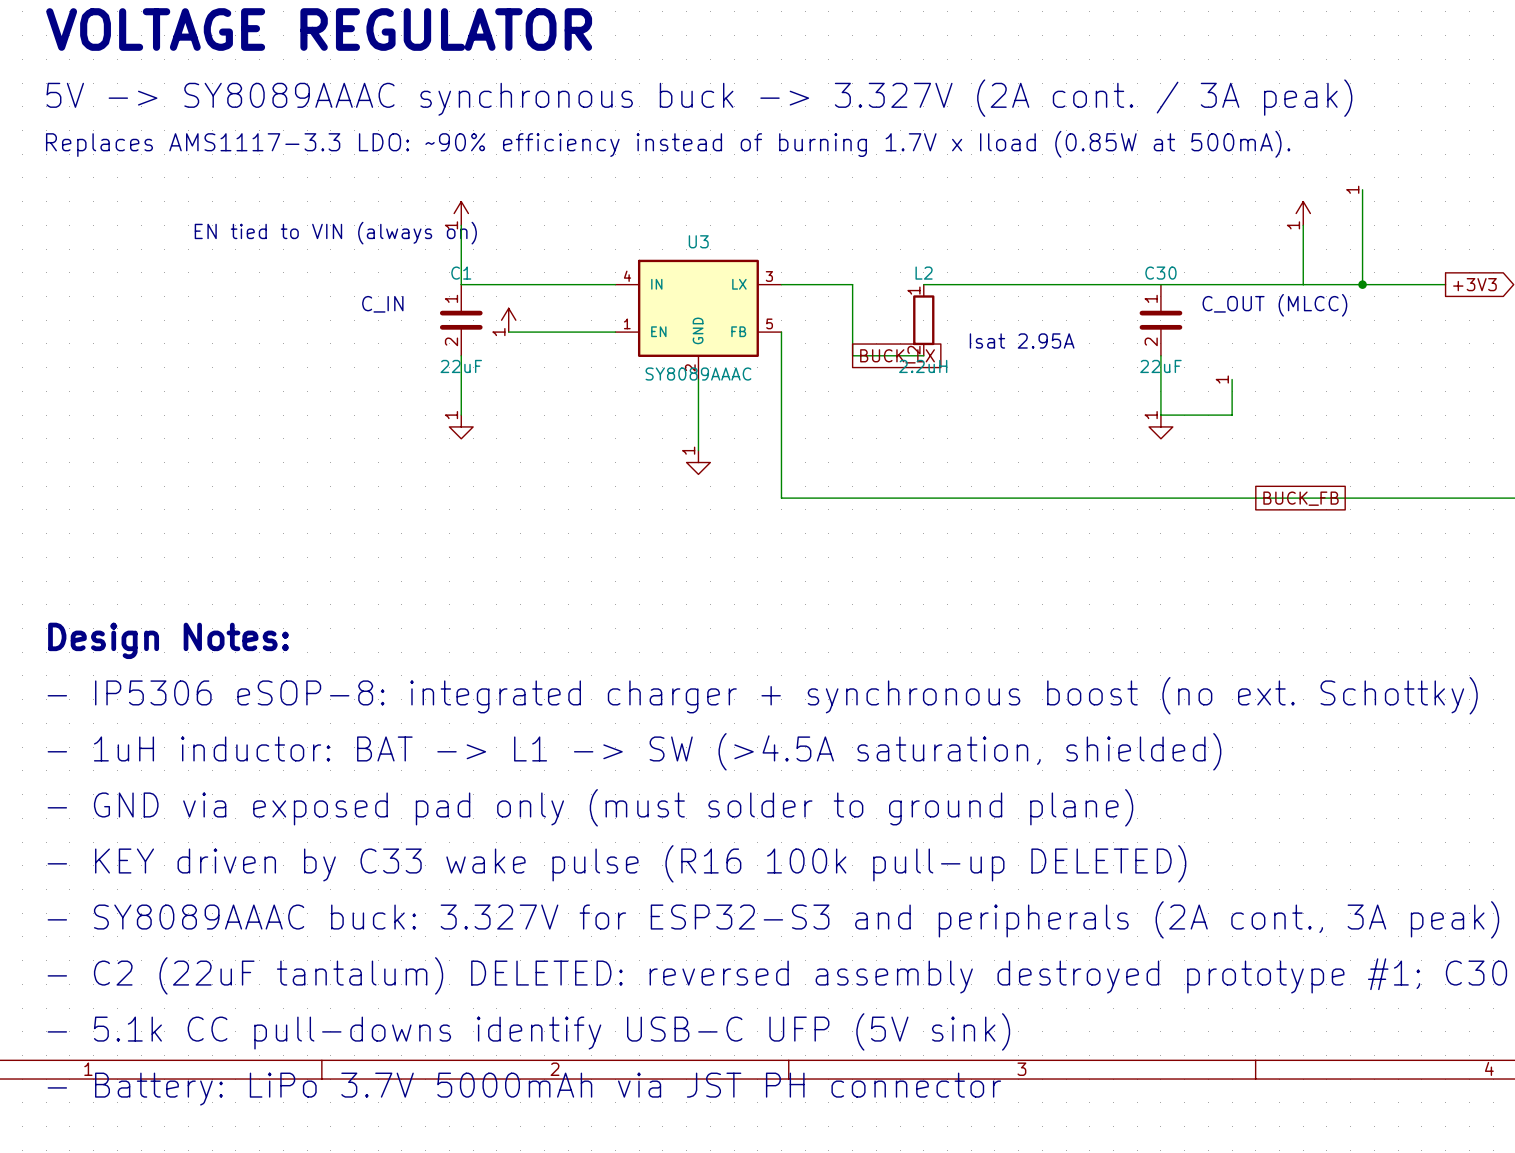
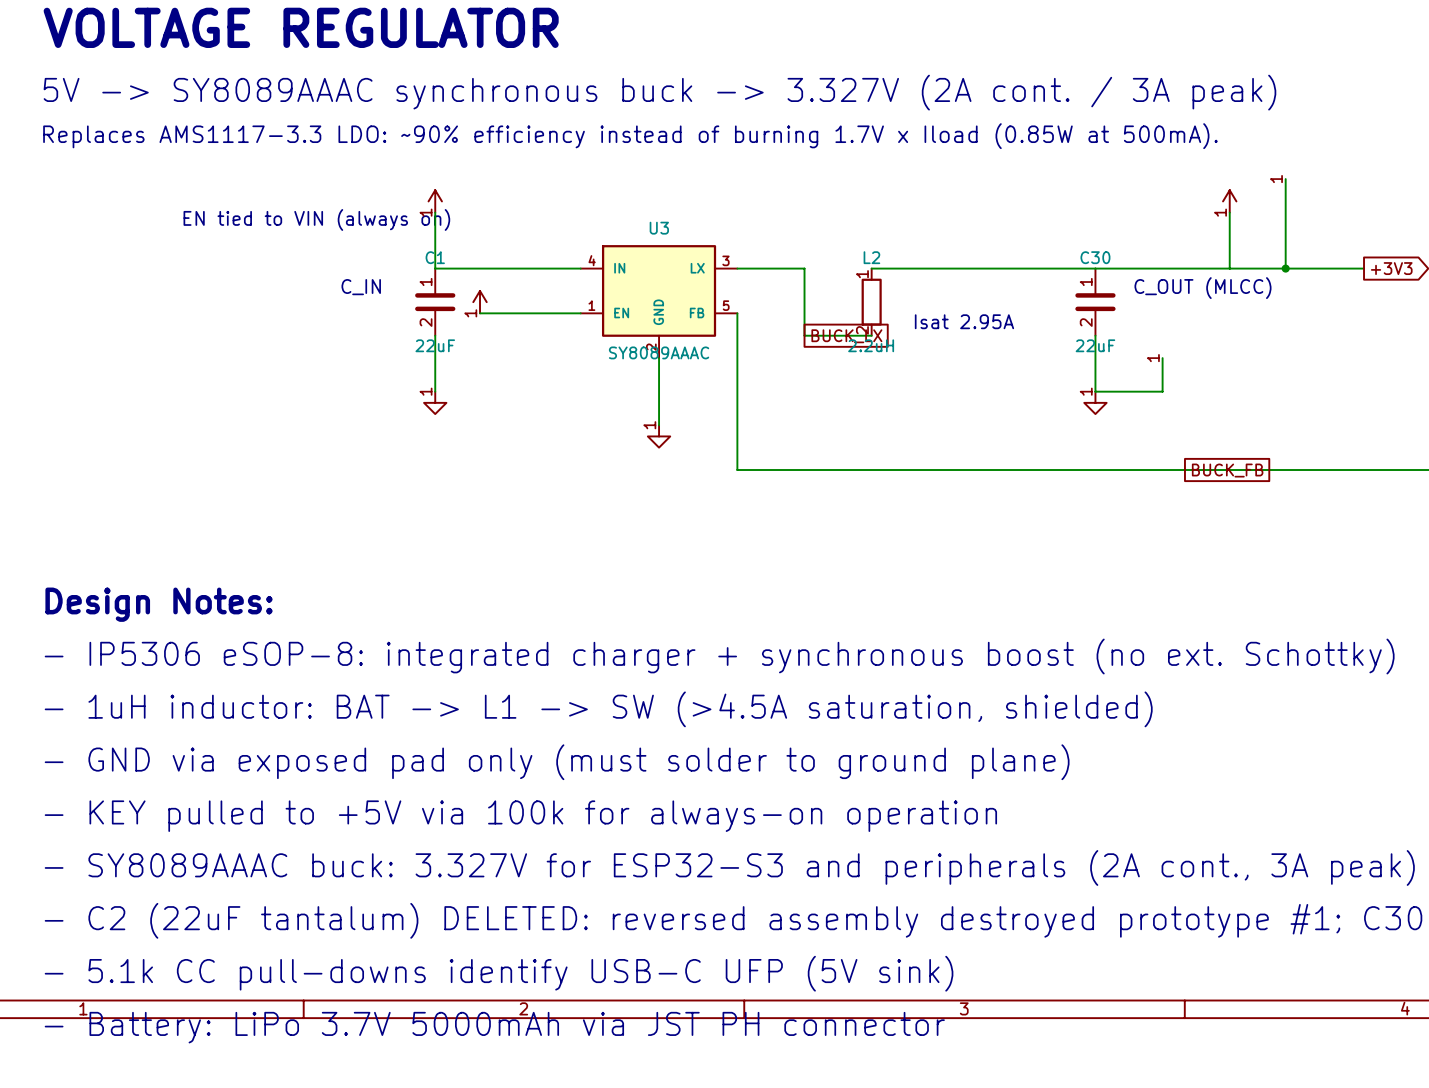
text: - KEY driven by C33 wake pulse (R16 100k pull-up DELETED) (616, 863) -> - KEY pulled to +5V via 100k for always-on operation (520, 816)

